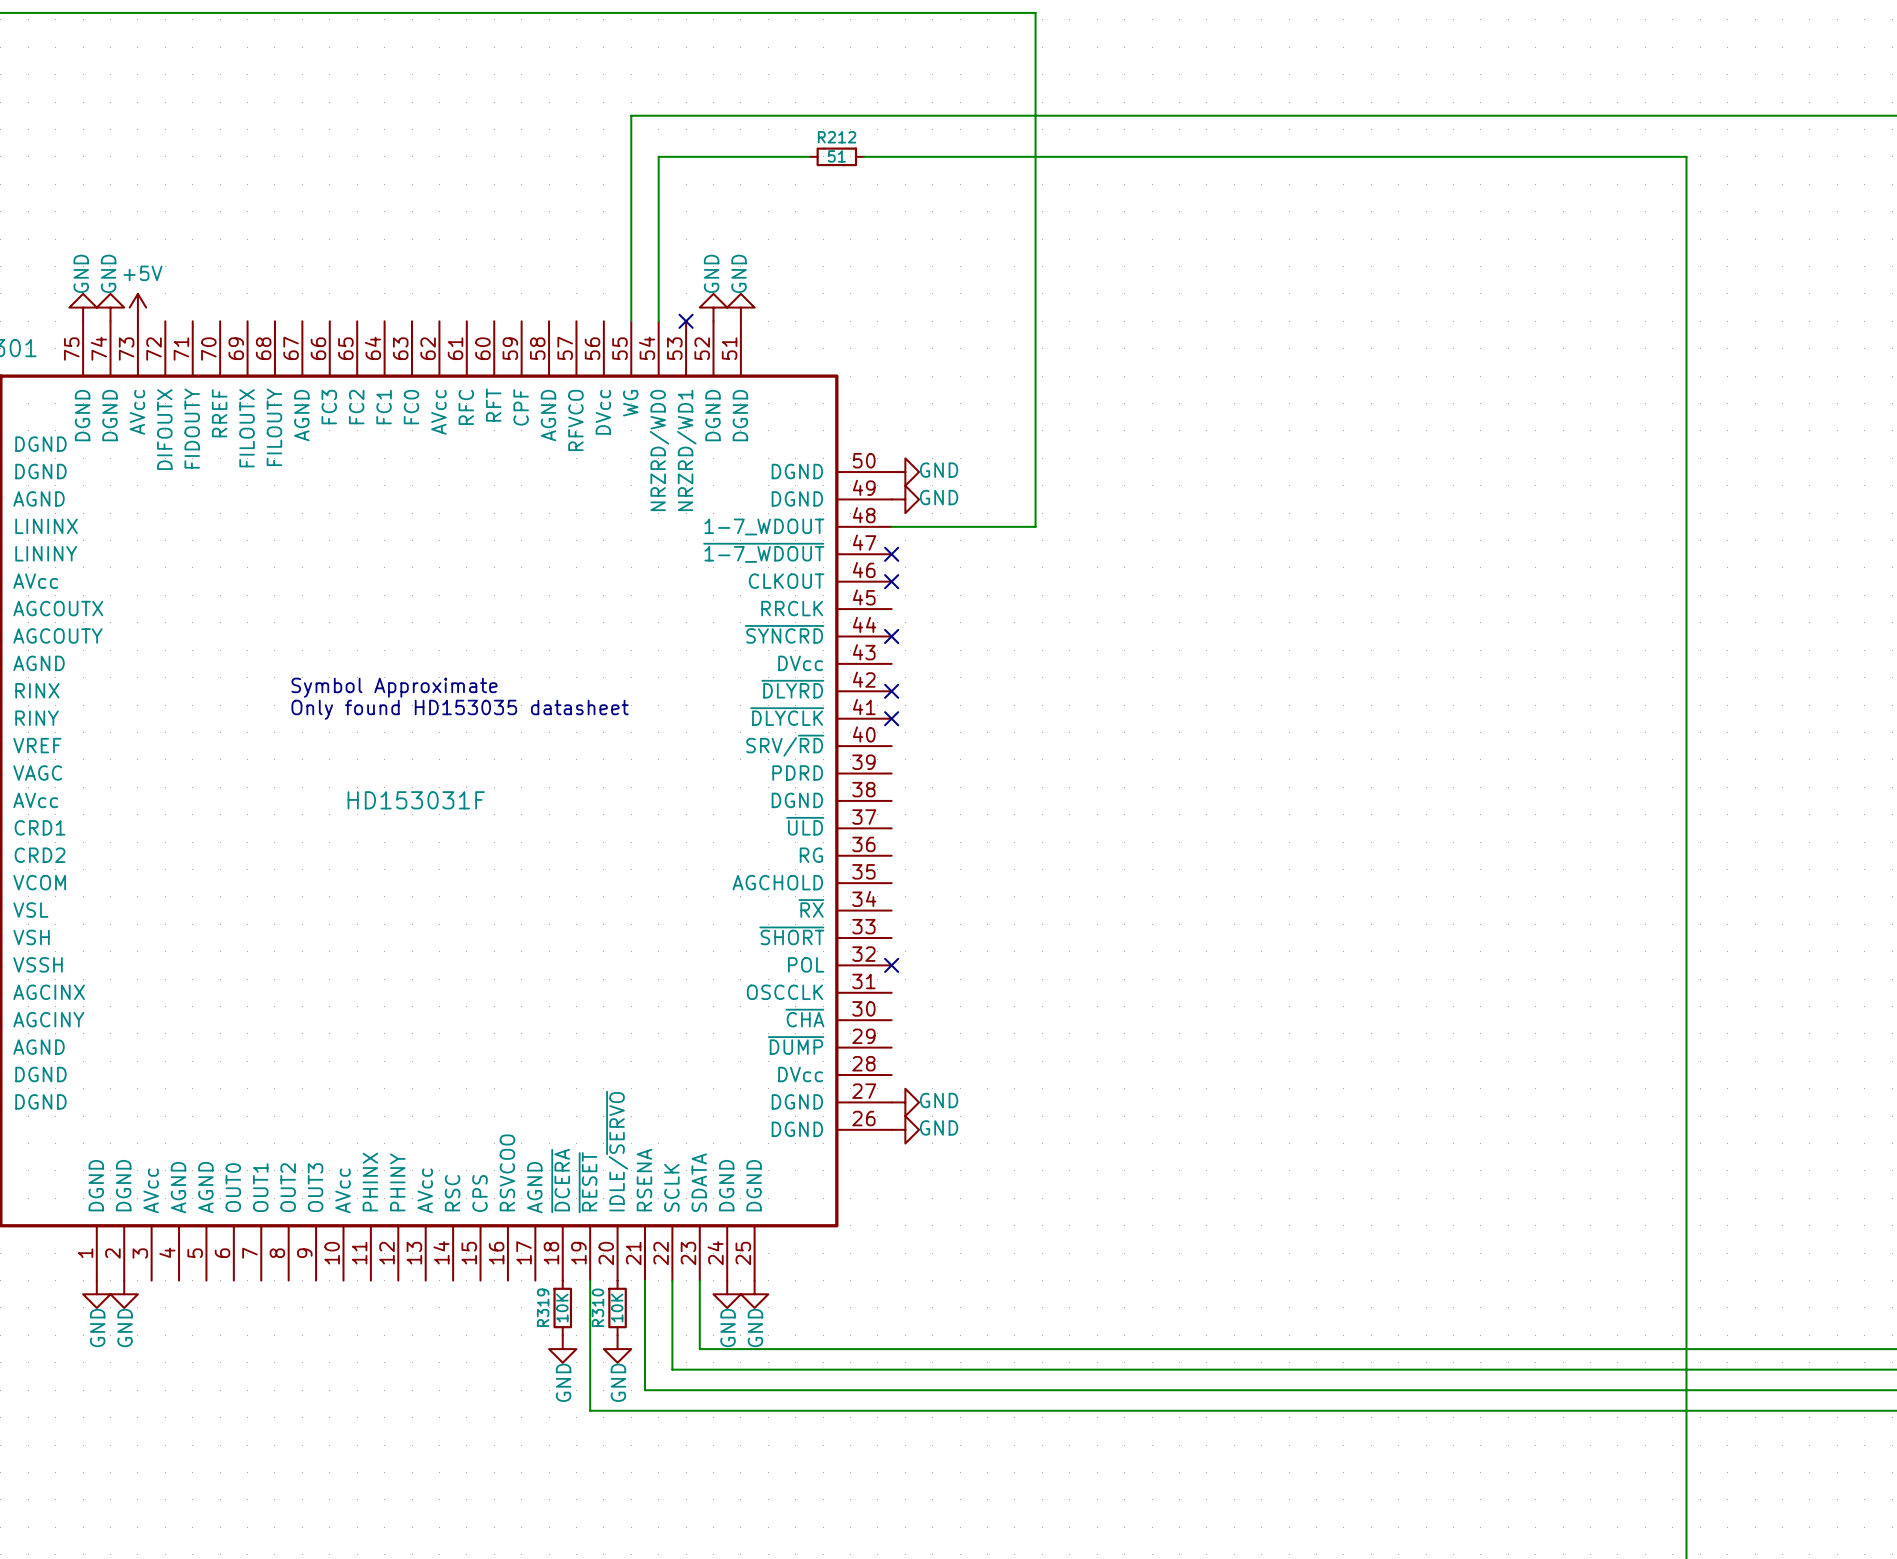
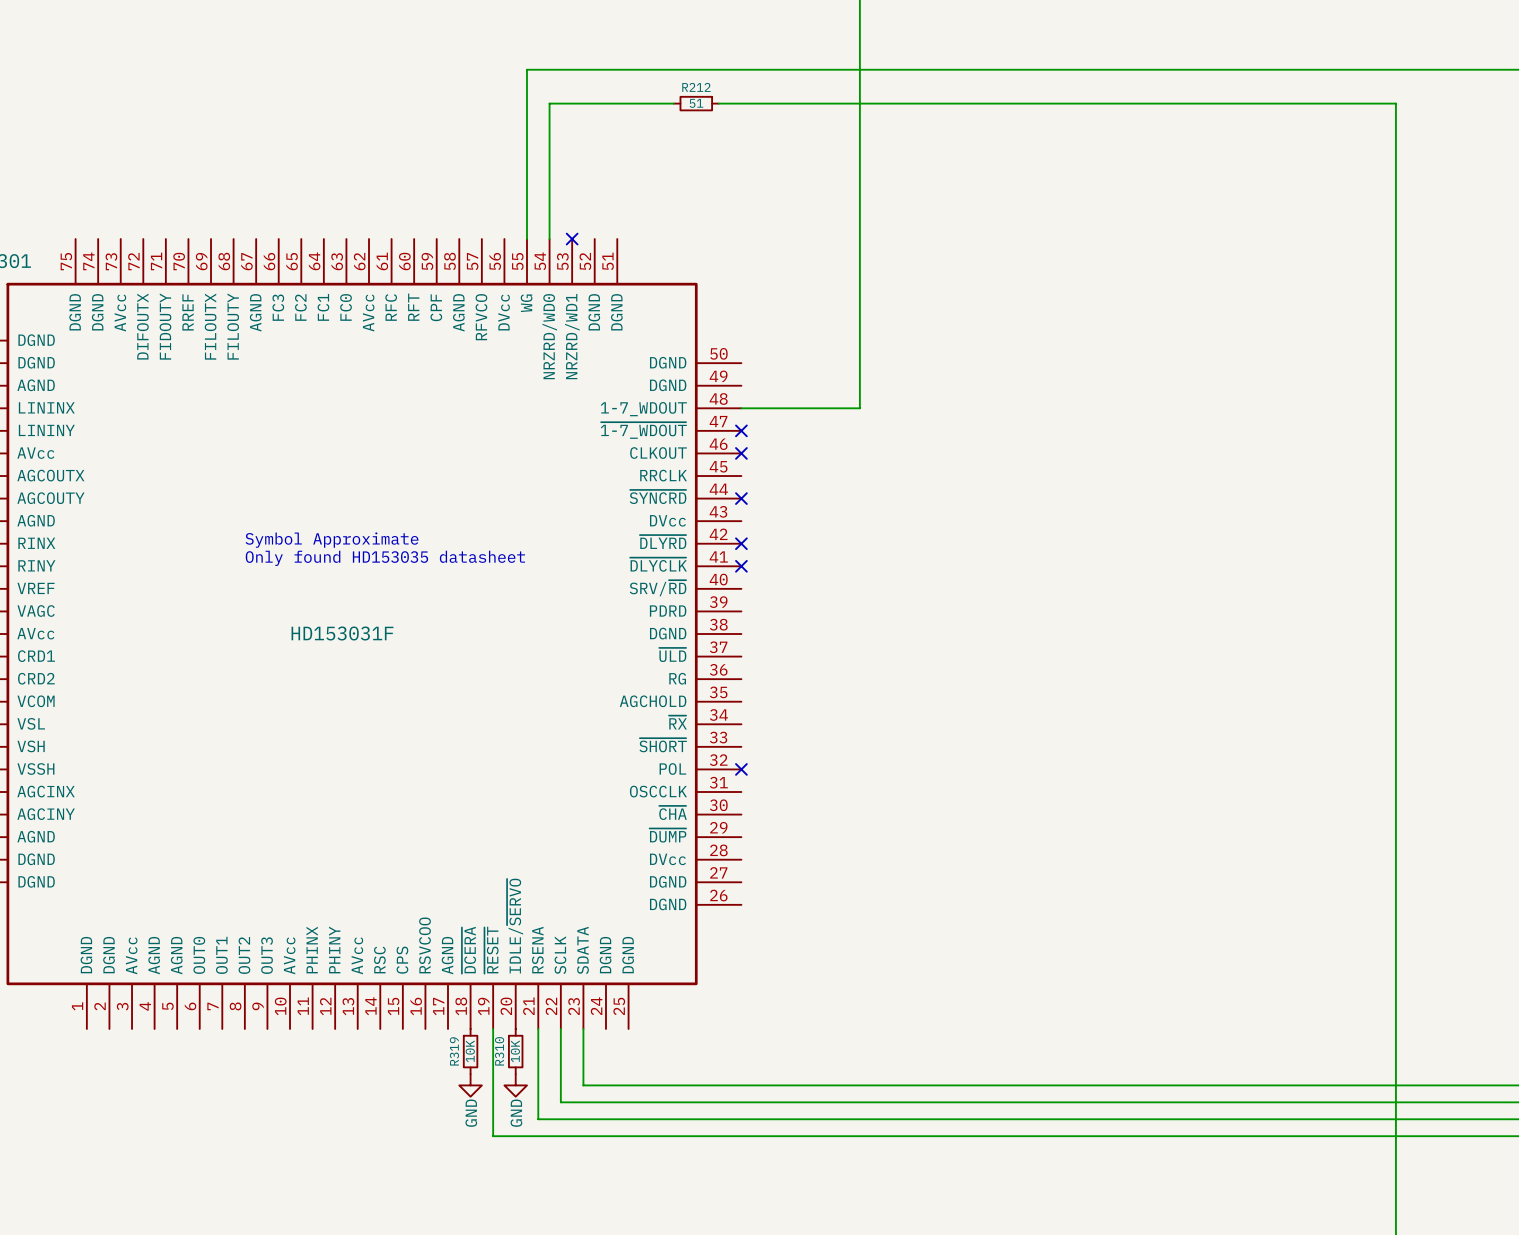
power symbol: GND (83, 307) -> none
power symbol: GND (110, 307) -> none
power symbol: +5V (137, 307) -> none
power symbol: GND (713, 307) -> none
power symbol: GND (740, 307) -> none
power symbol: GND (905, 472) -> none
power symbol: GND (905, 499) -> none
power symbol: GND (905, 1102) -> none
power symbol: GND (905, 1129) -> none
power symbol: GND (96, 1294) -> none
power symbol: GND (124, 1294) -> none
power symbol: GND (727, 1294) -> none
power symbol: GND (754, 1294) -> none

